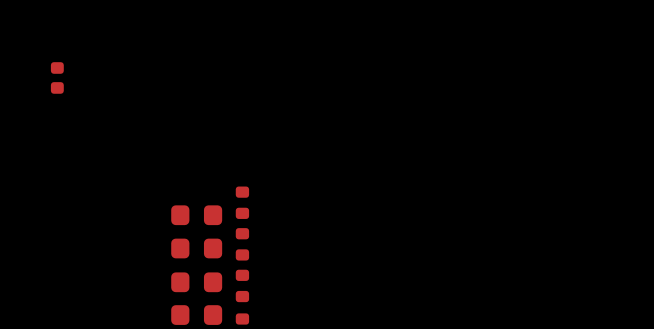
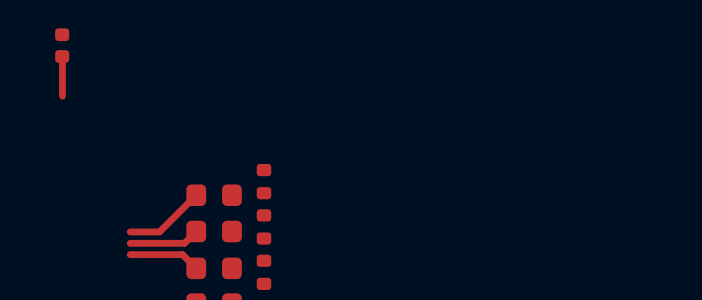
top track: none -> (62, 56) (62, 96)
top track: none -> (196, 195) (159, 231) (130, 231)
top track: none -> (196, 231) (184, 243) (130, 243)
top track: none -> (130, 254) (182, 254) (196, 268)

